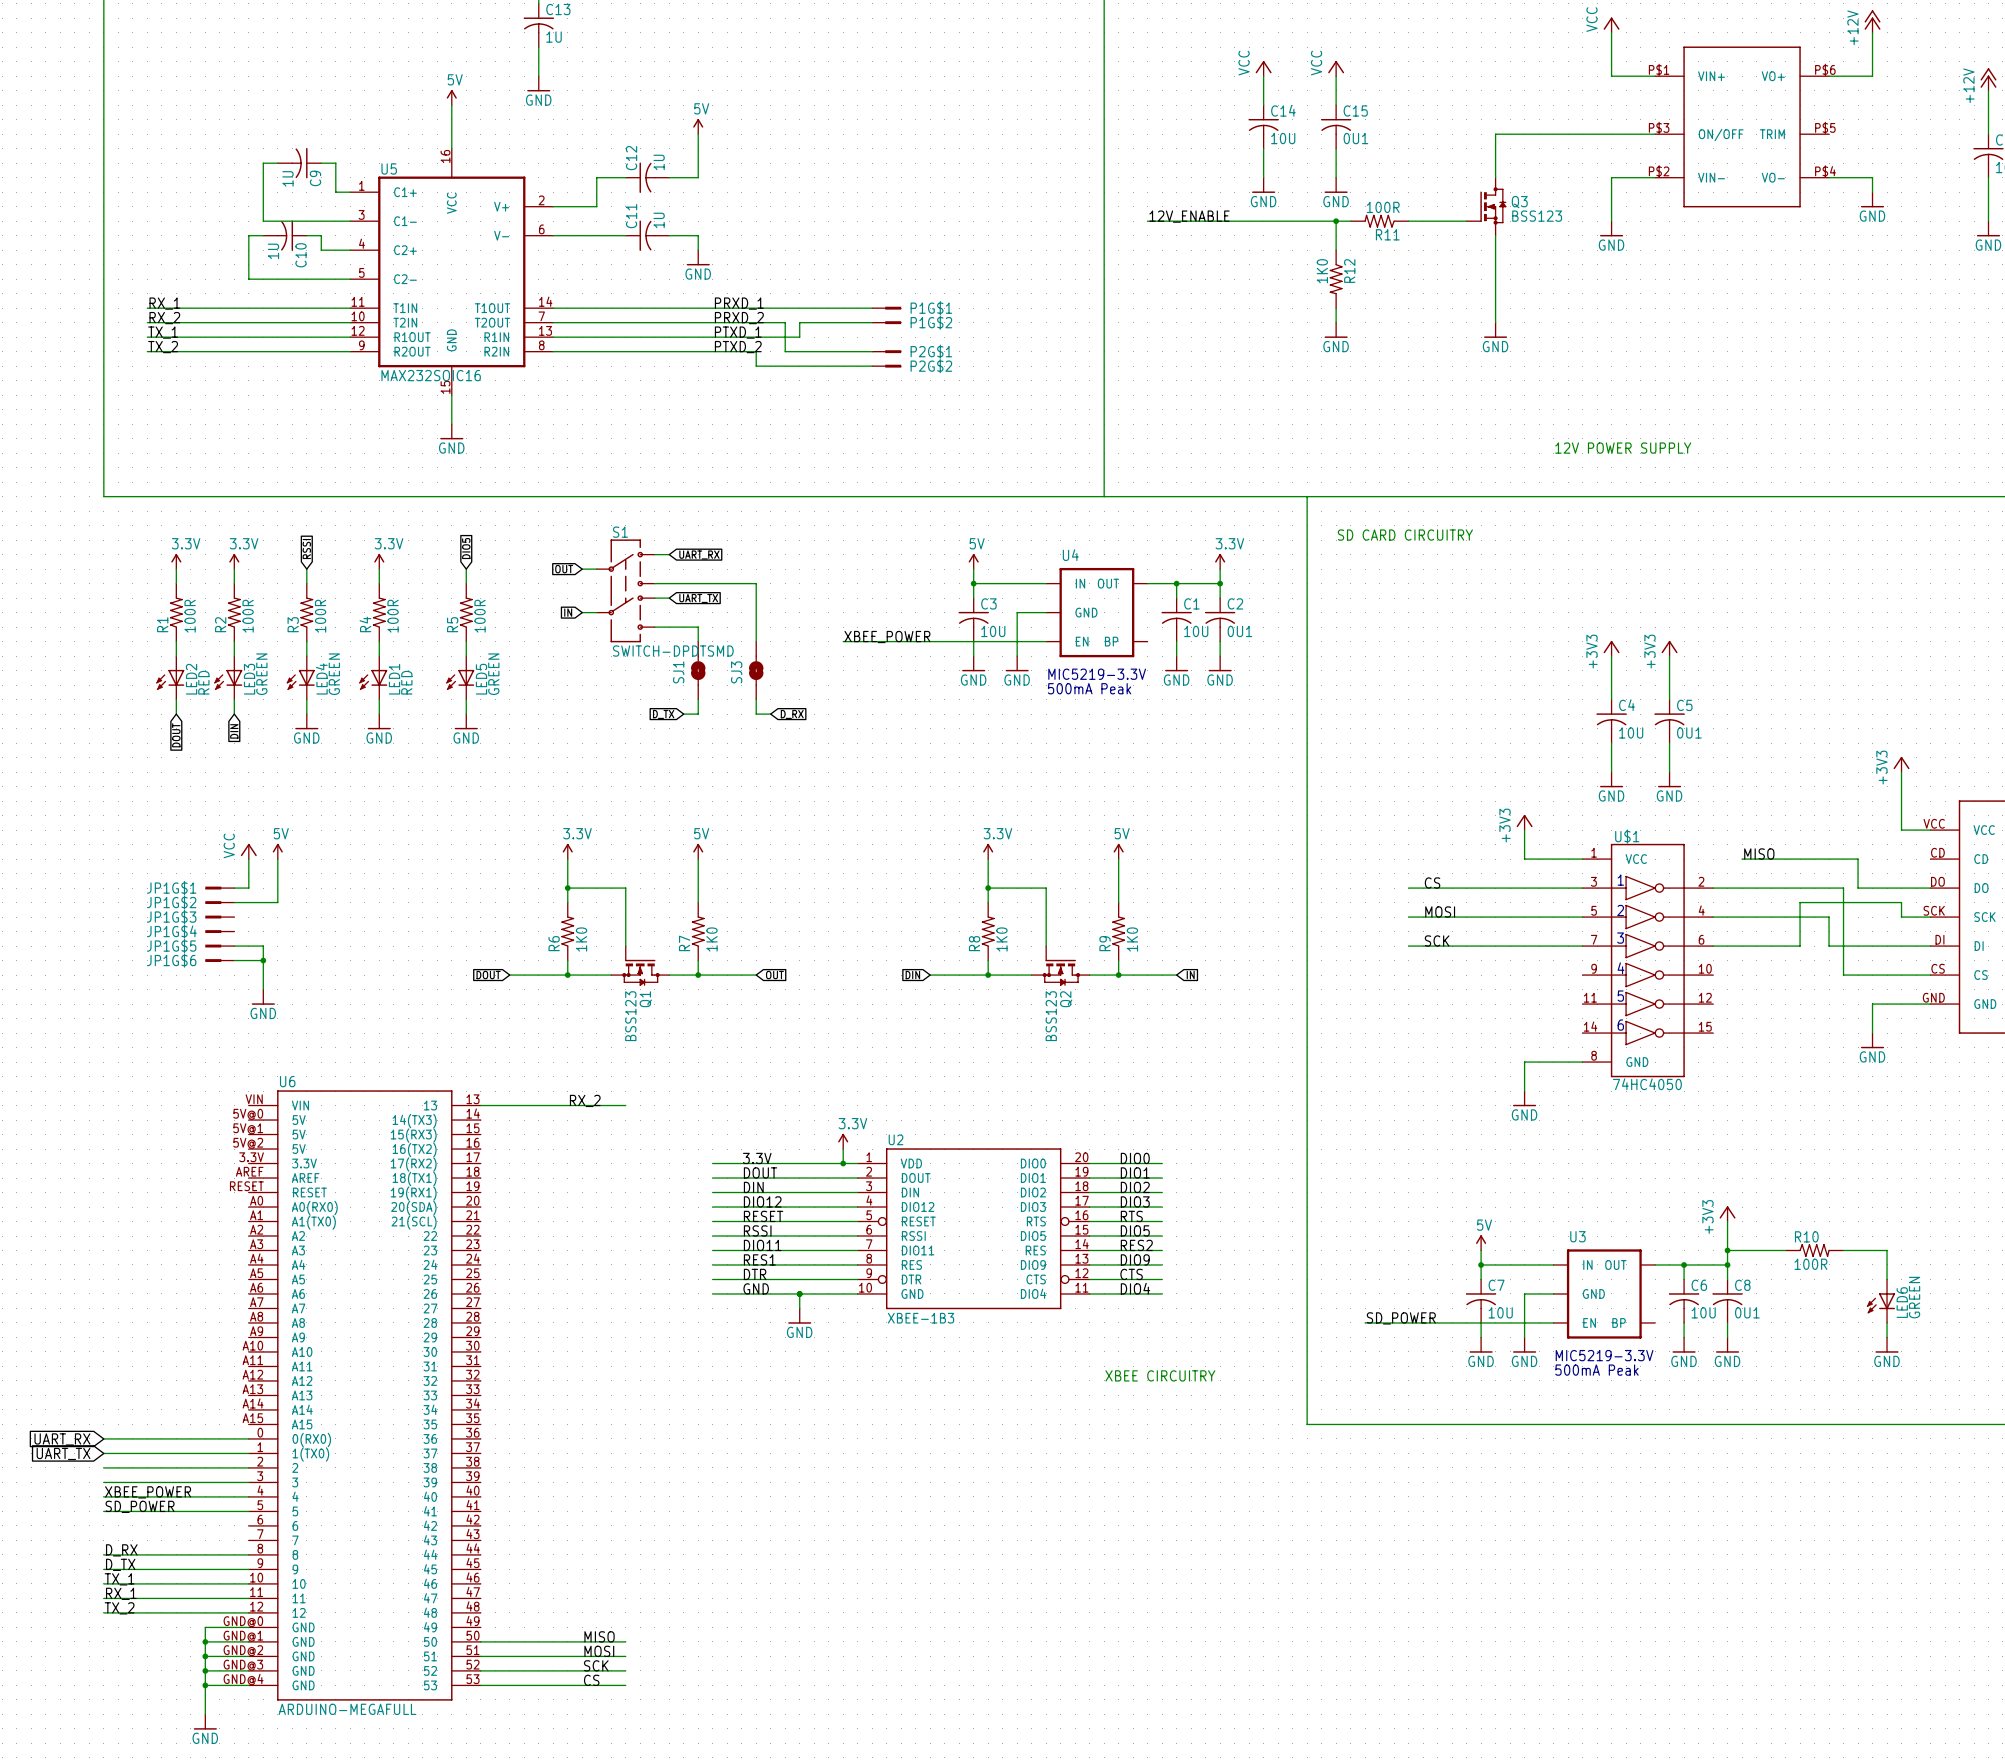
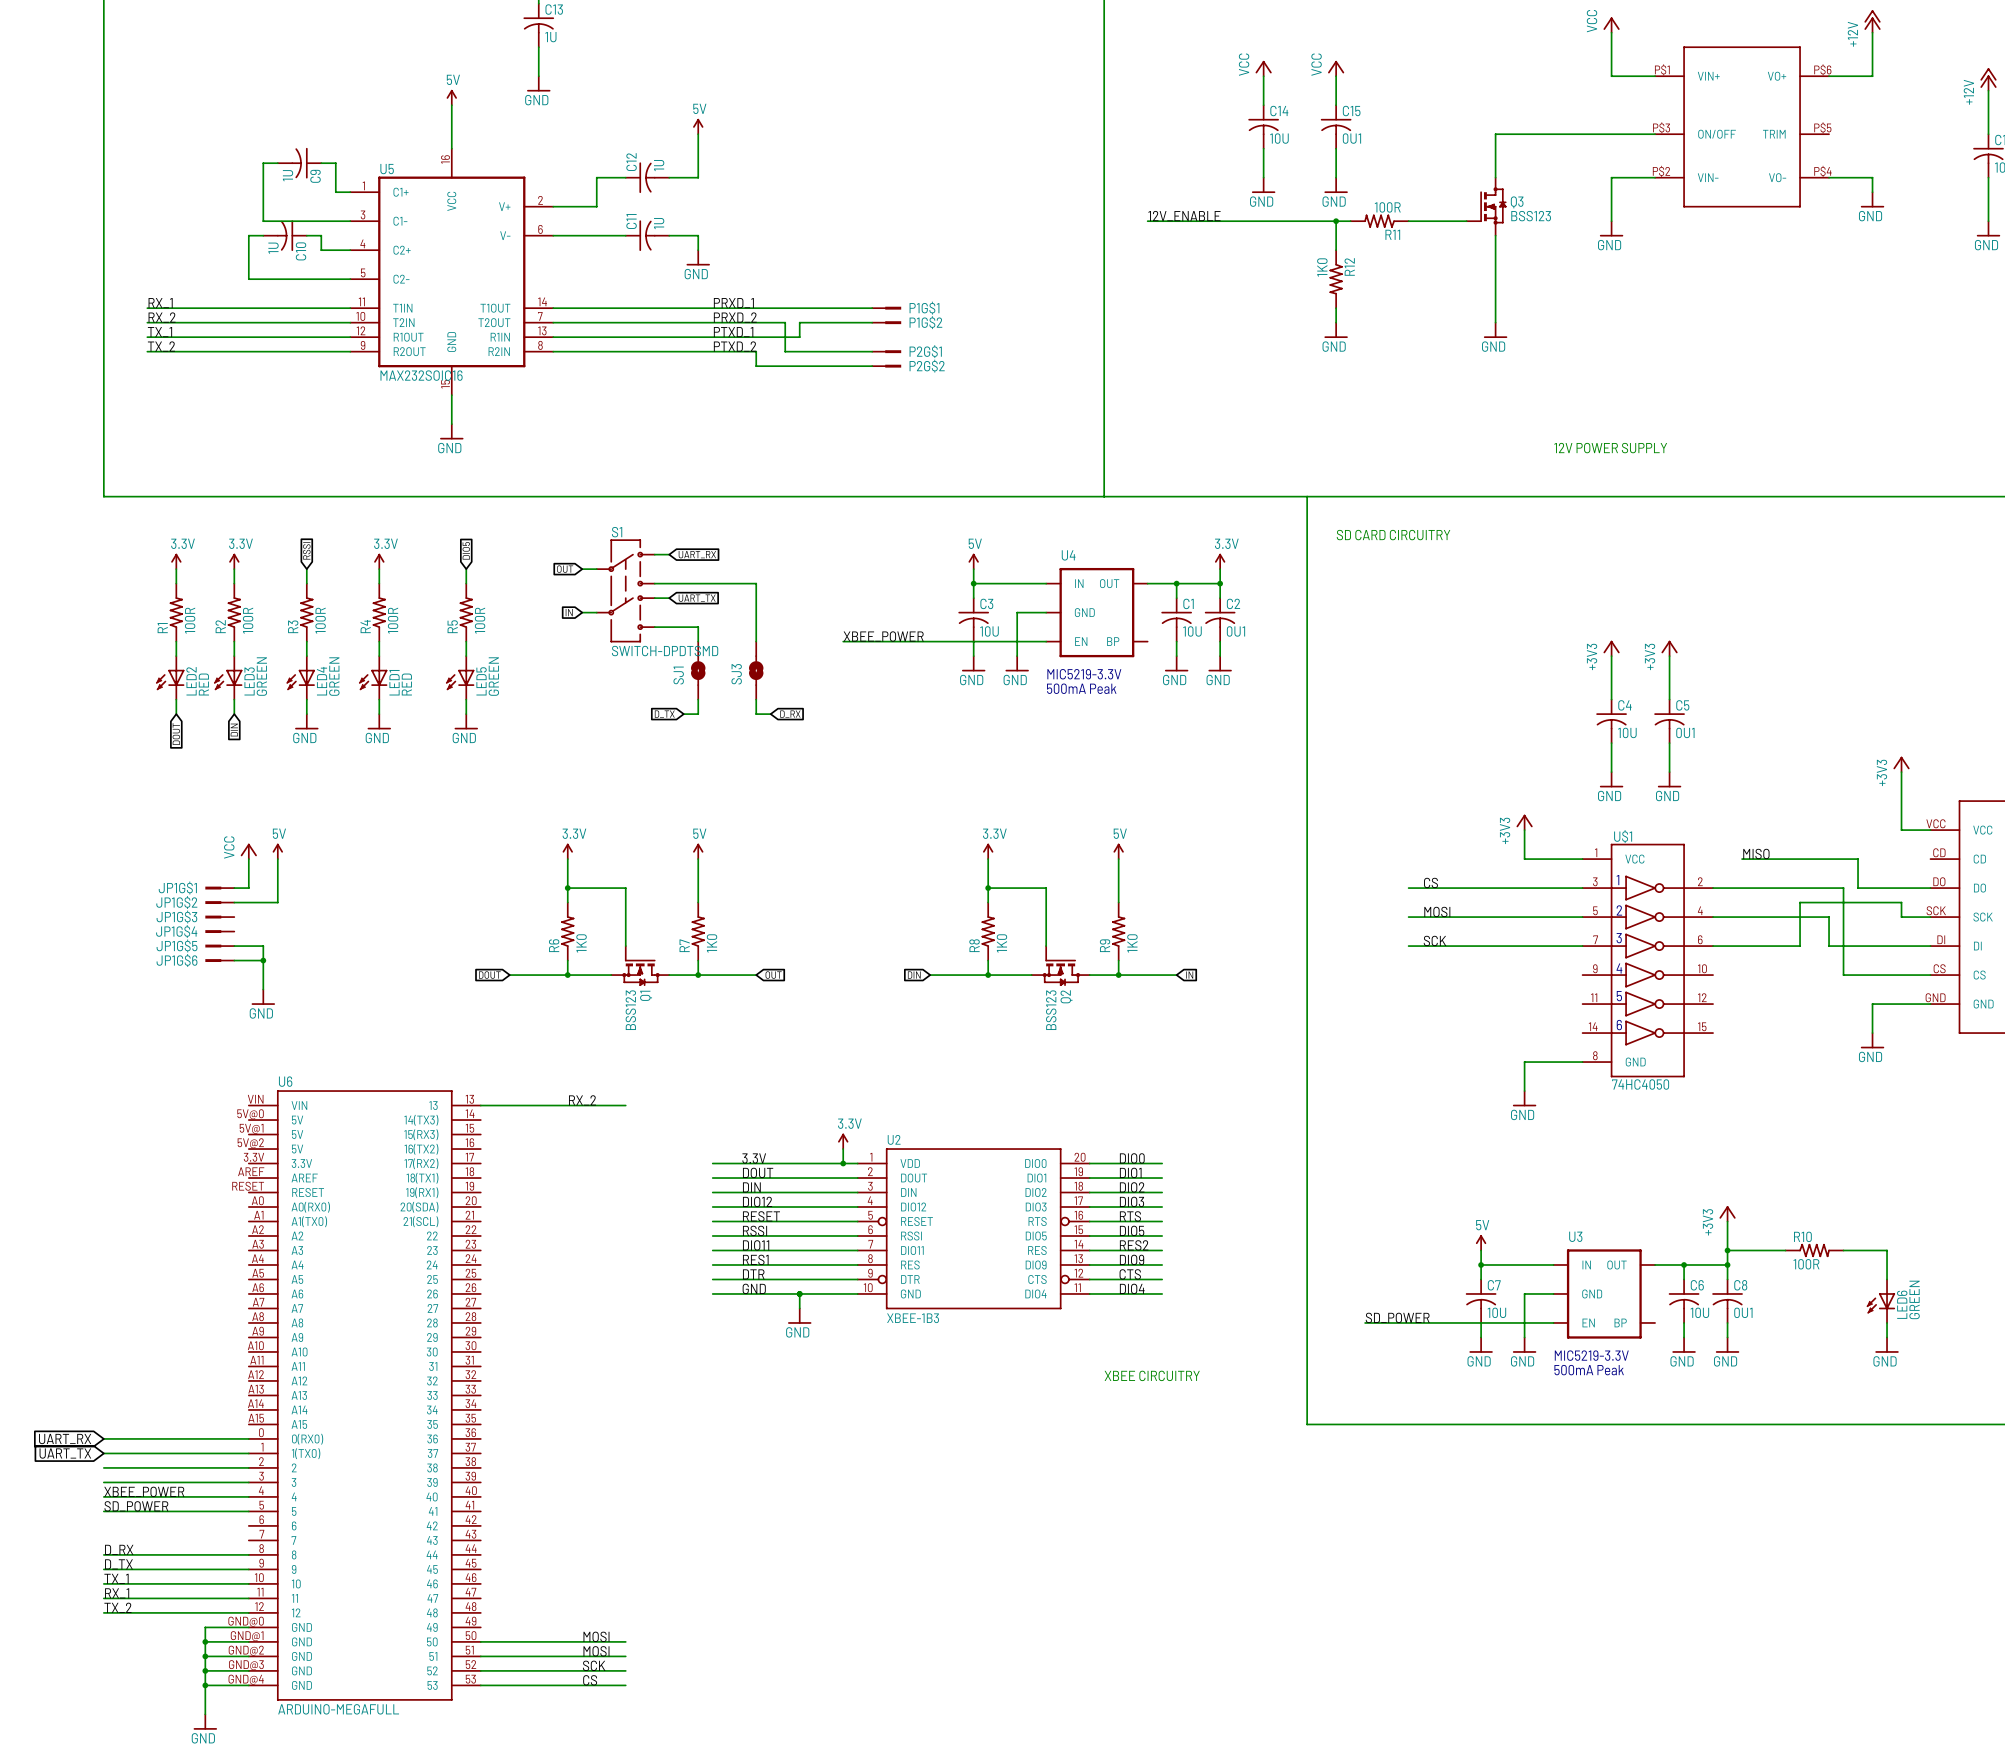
label: MISO (599, 1636) -> MOSI (596, 1636)

